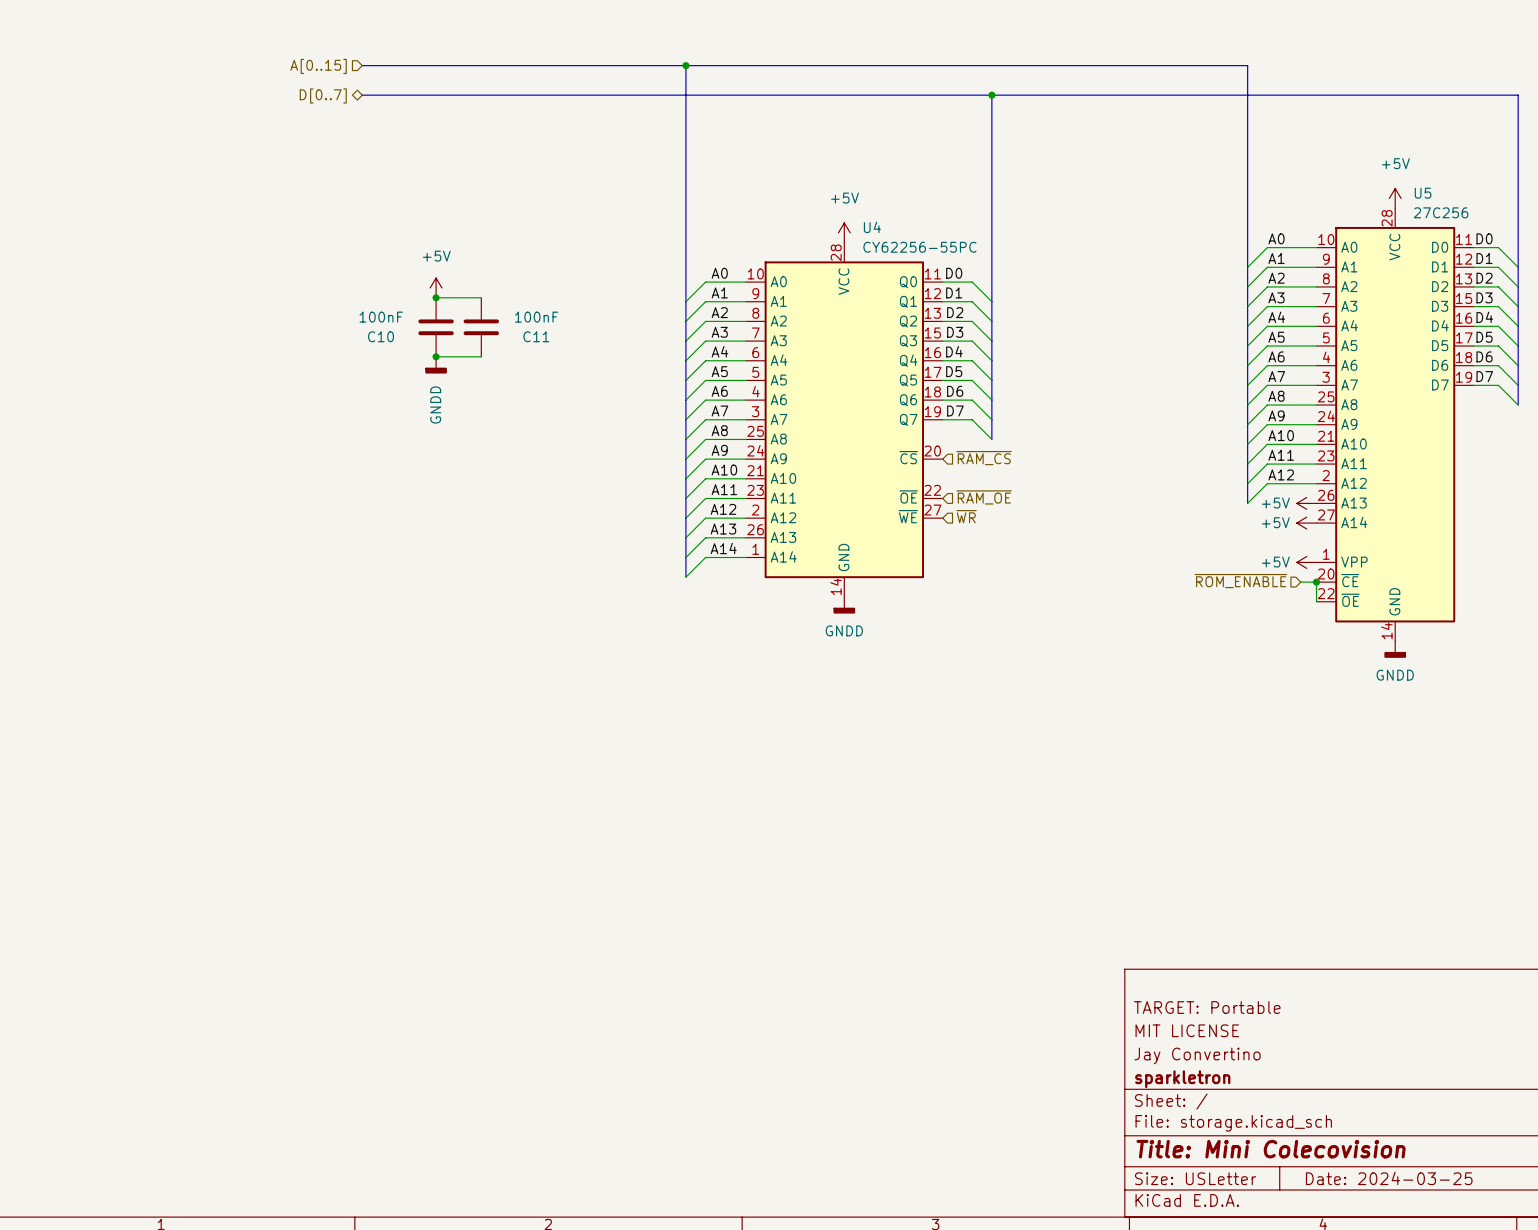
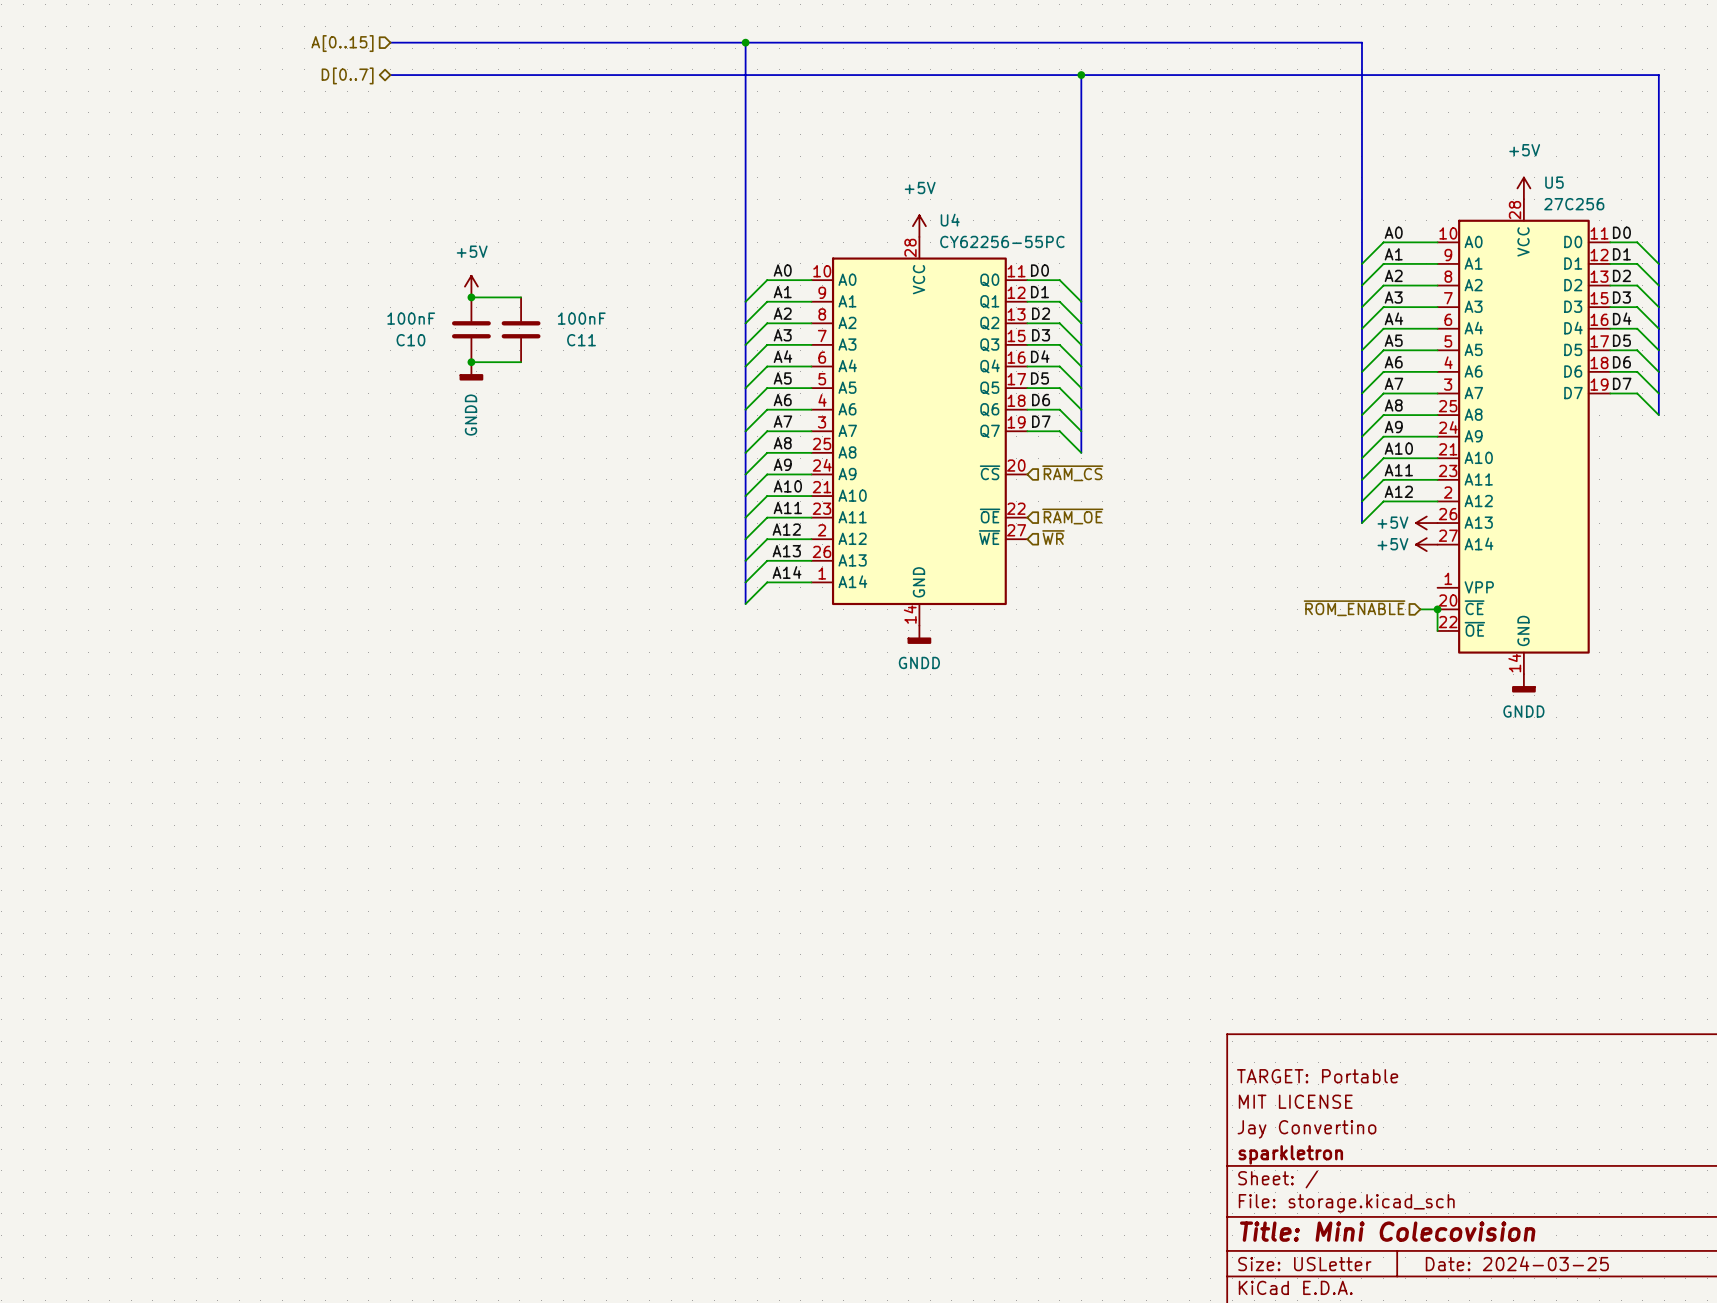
power symbol: +5V (1306, 562) -> none

